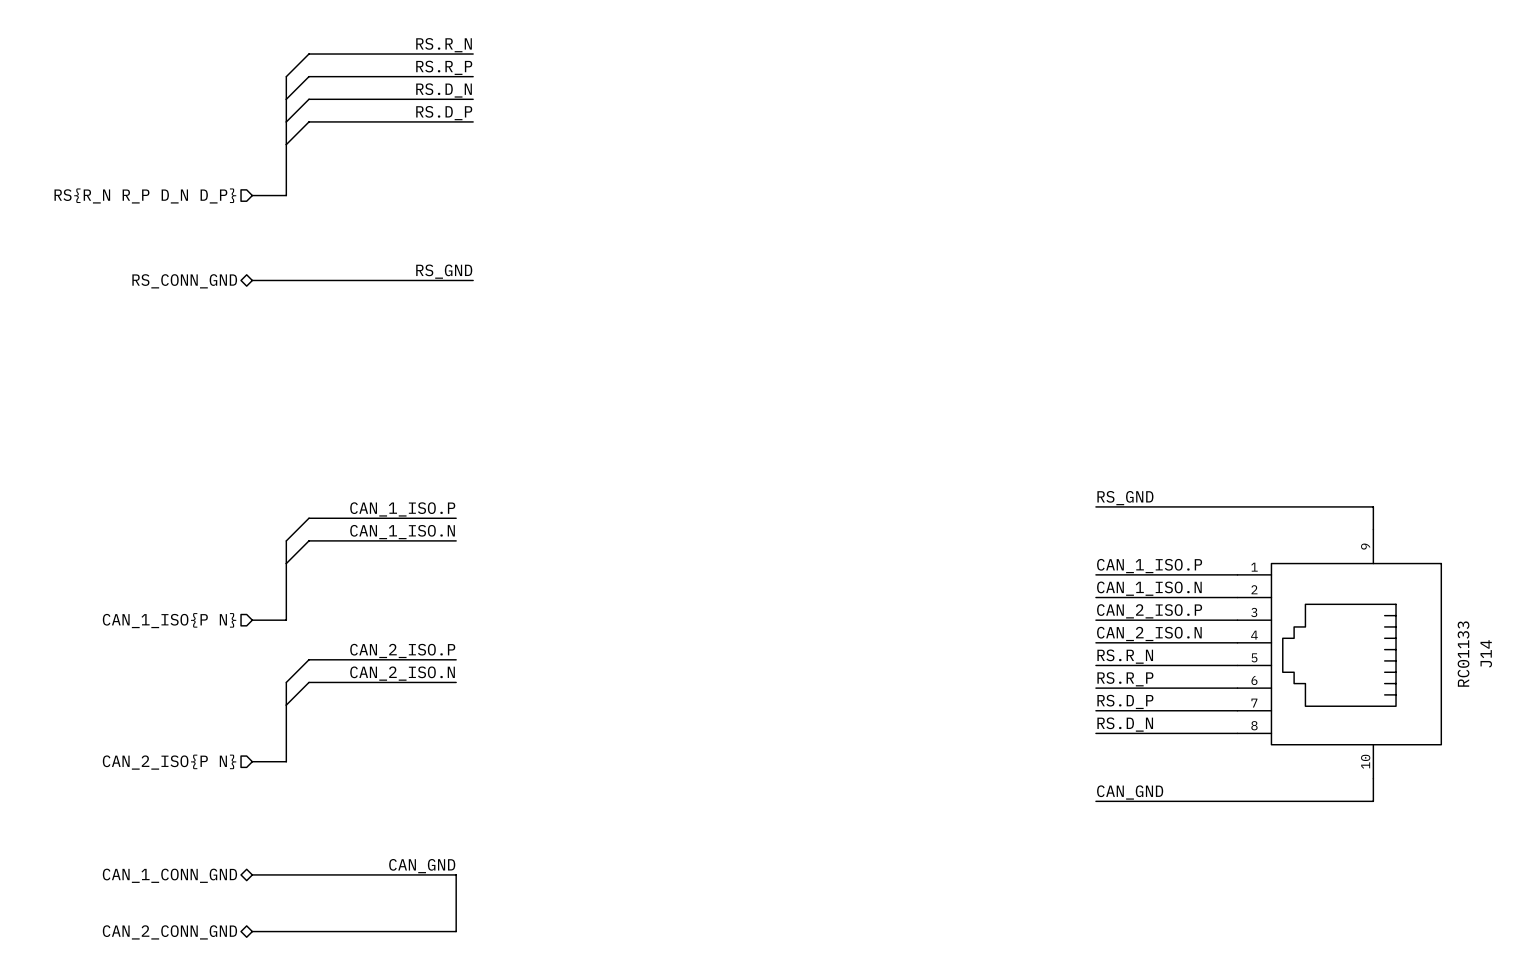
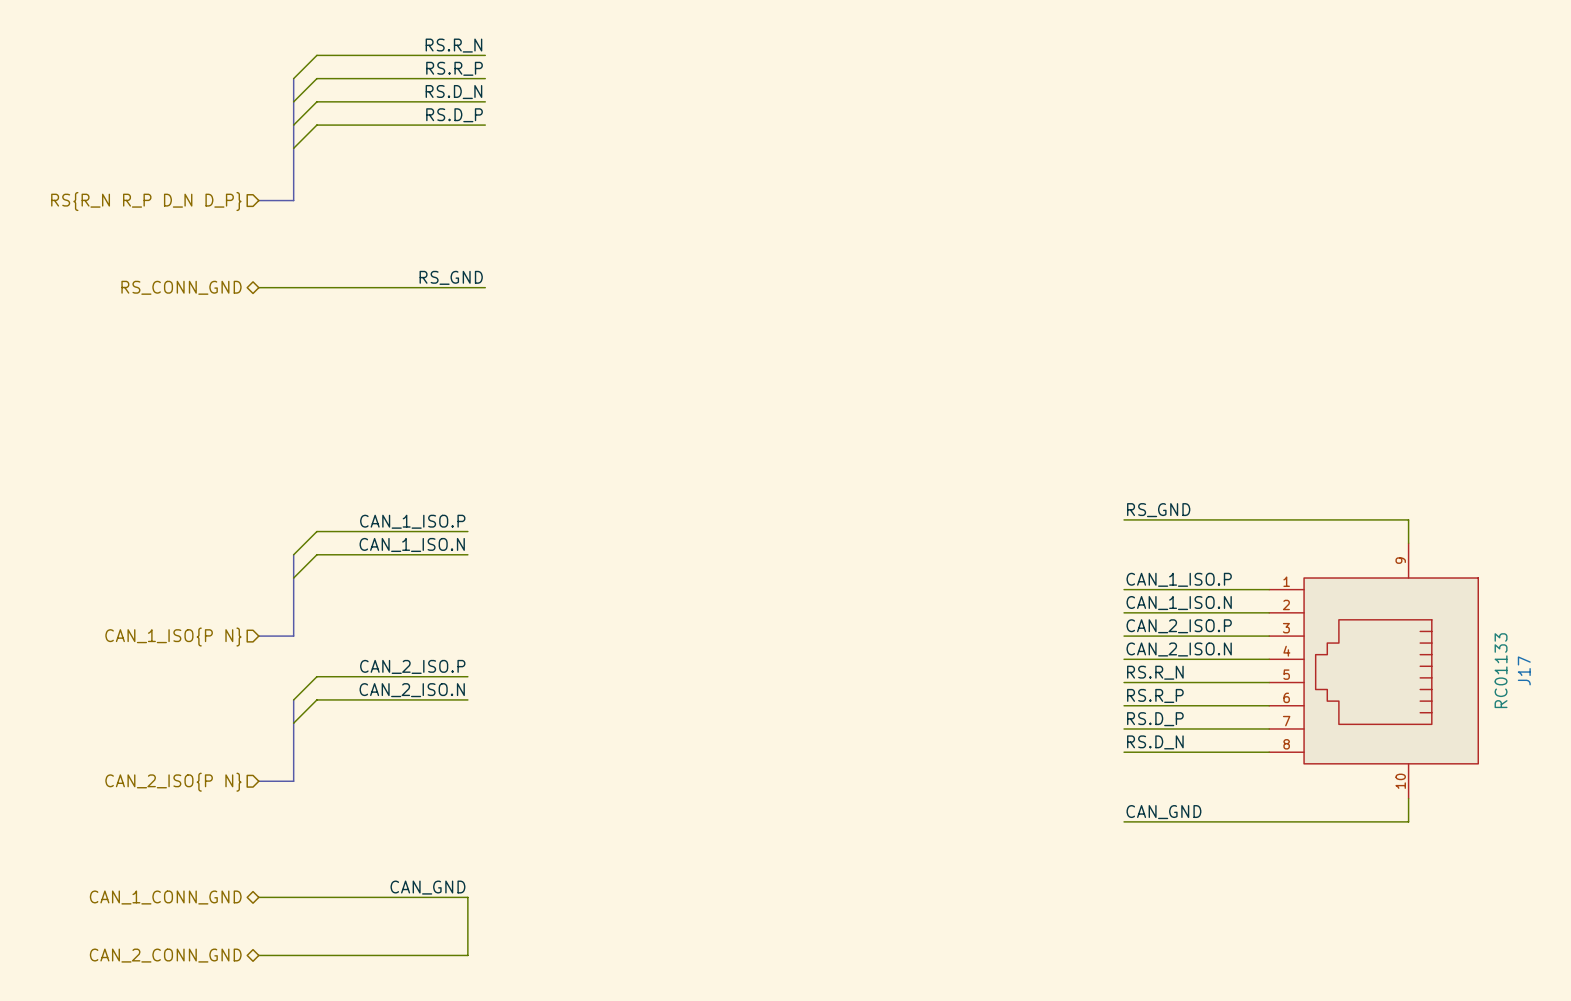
J14 name: J14 (1486, 653) -> J17 (1524, 670)

